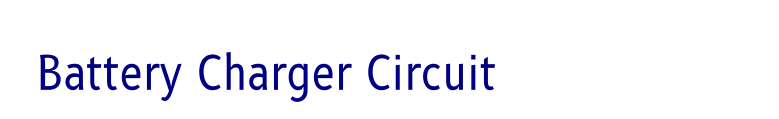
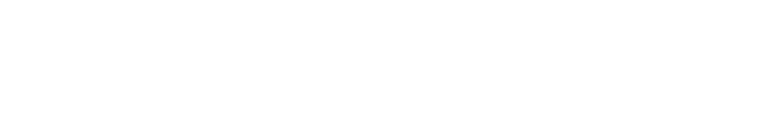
text: Battery Charger Circuit (267, 76) -> none

